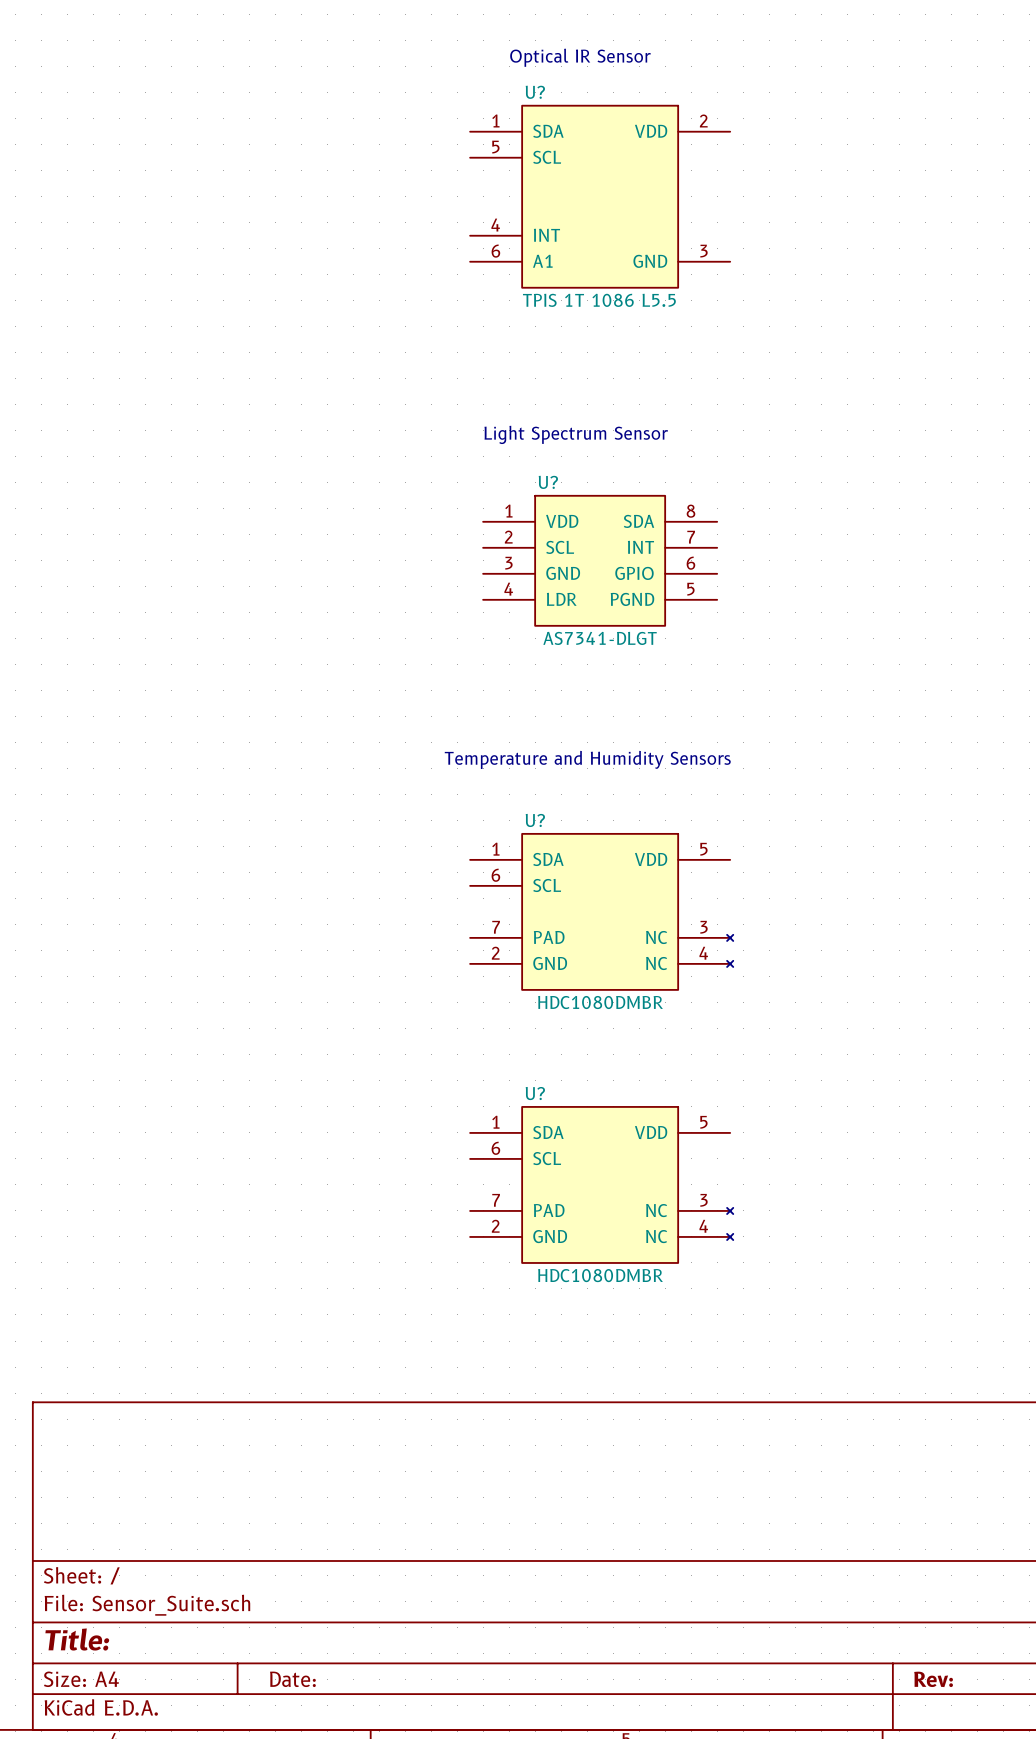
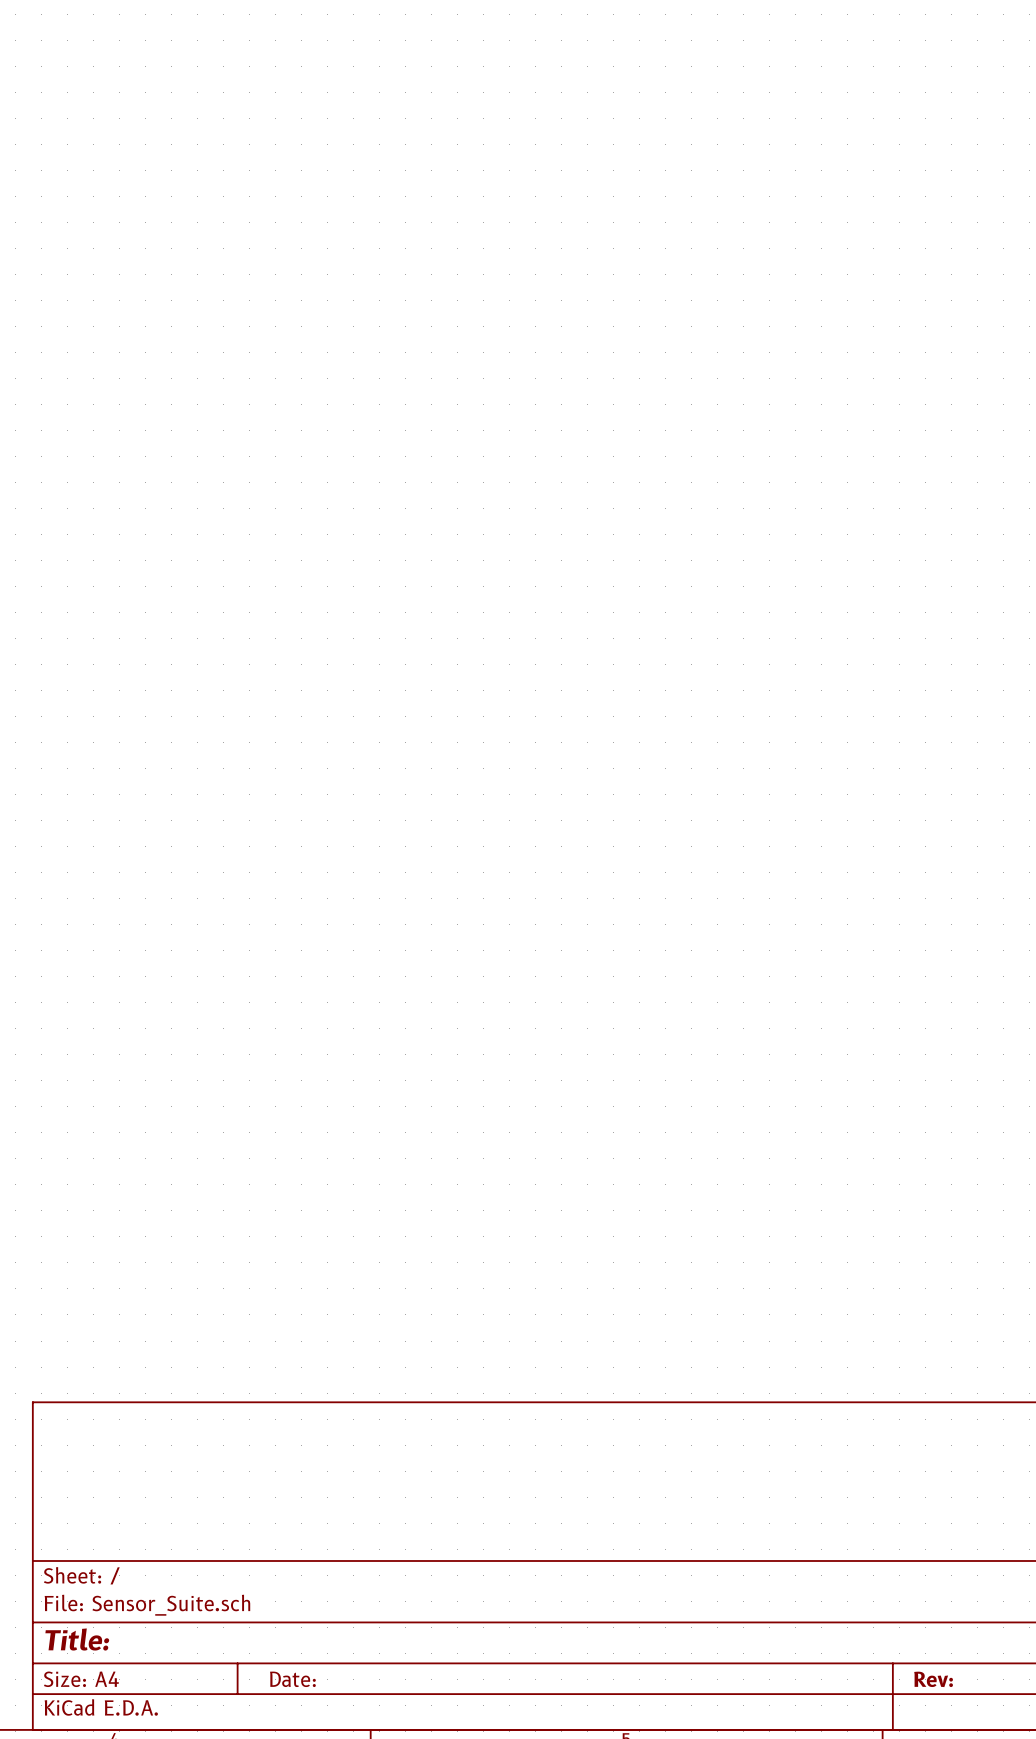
text: Optical IR Sensor (580, 57) -> none
U?: (600, 196) -> none
text: Light Spectrum Sensor (576, 434) -> none
U?: (600, 560) -> none
text: Temperature and Humidity Sensors (587, 759) -> none
U?: (601, 911) -> none
U?: (601, 1184) -> none

